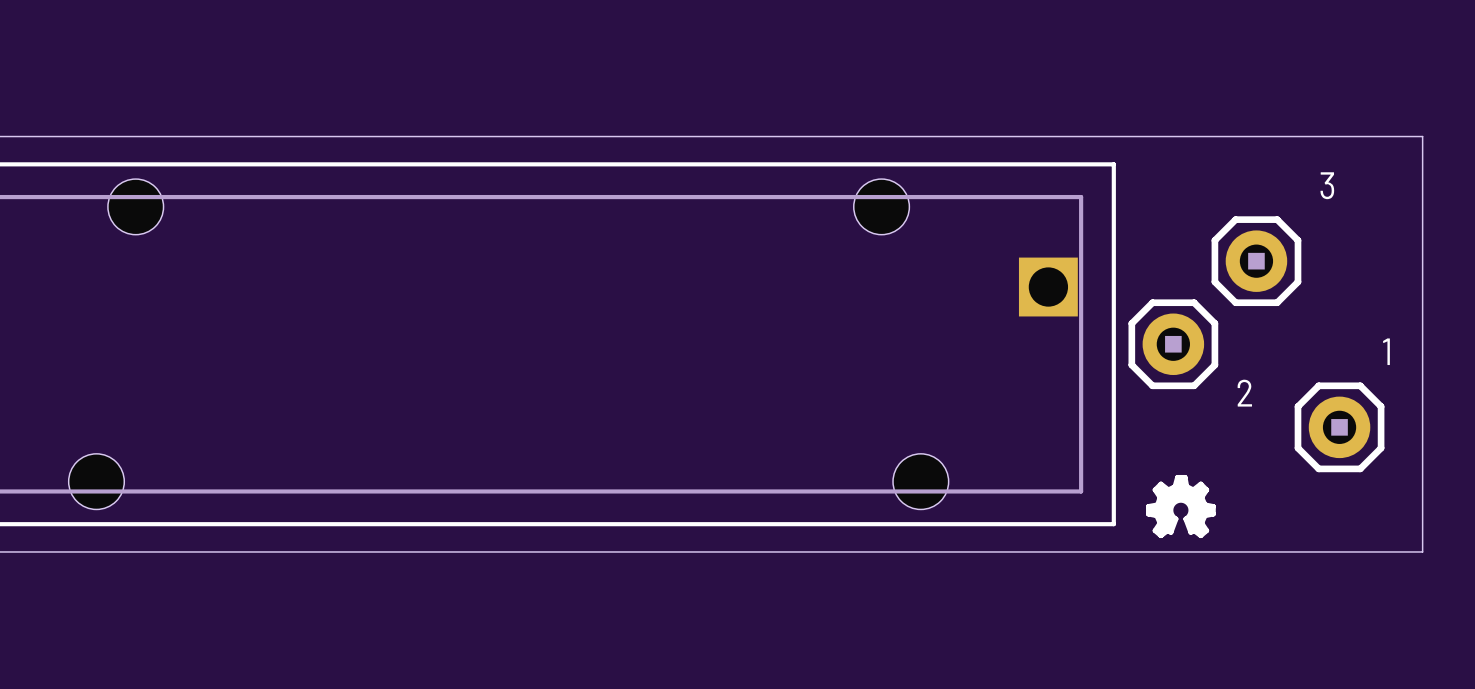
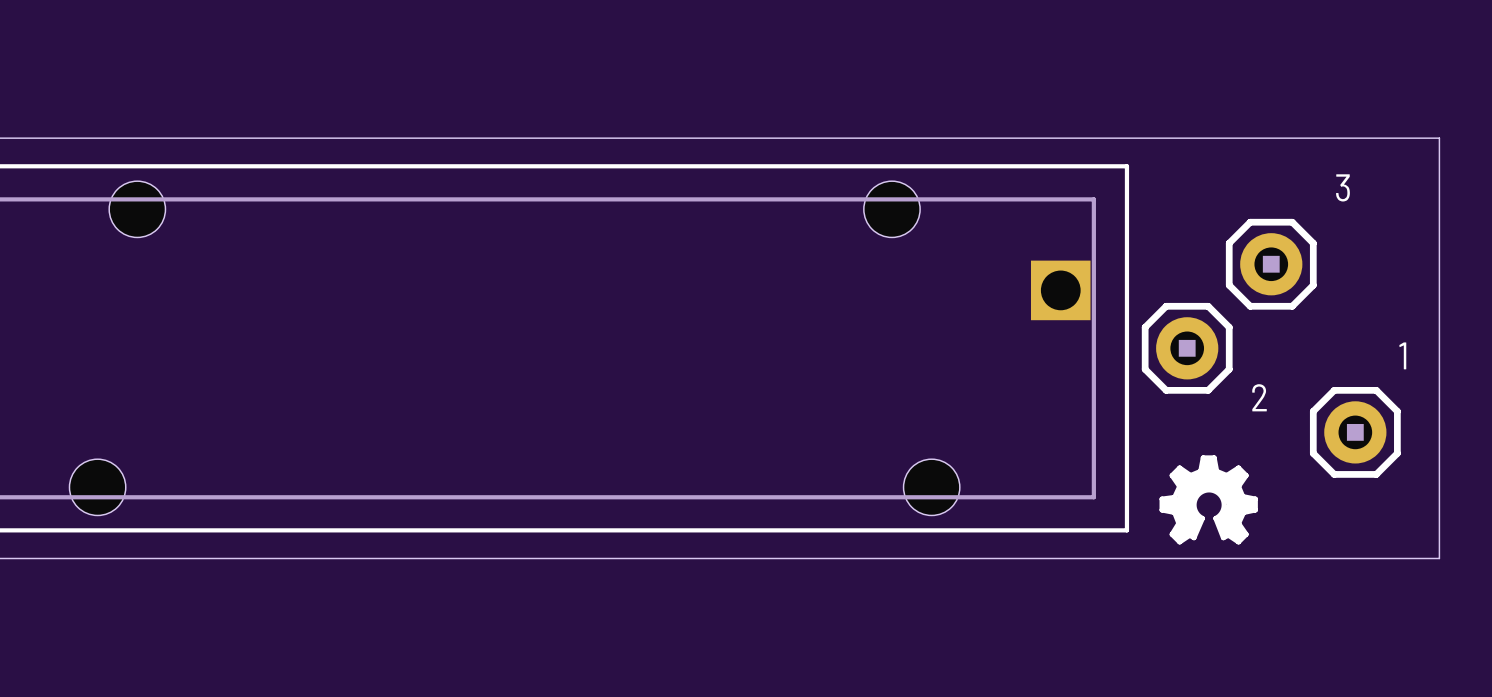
drawing shape: [1146, 474, 1216, 539] -> [1159, 455, 1258, 545]

